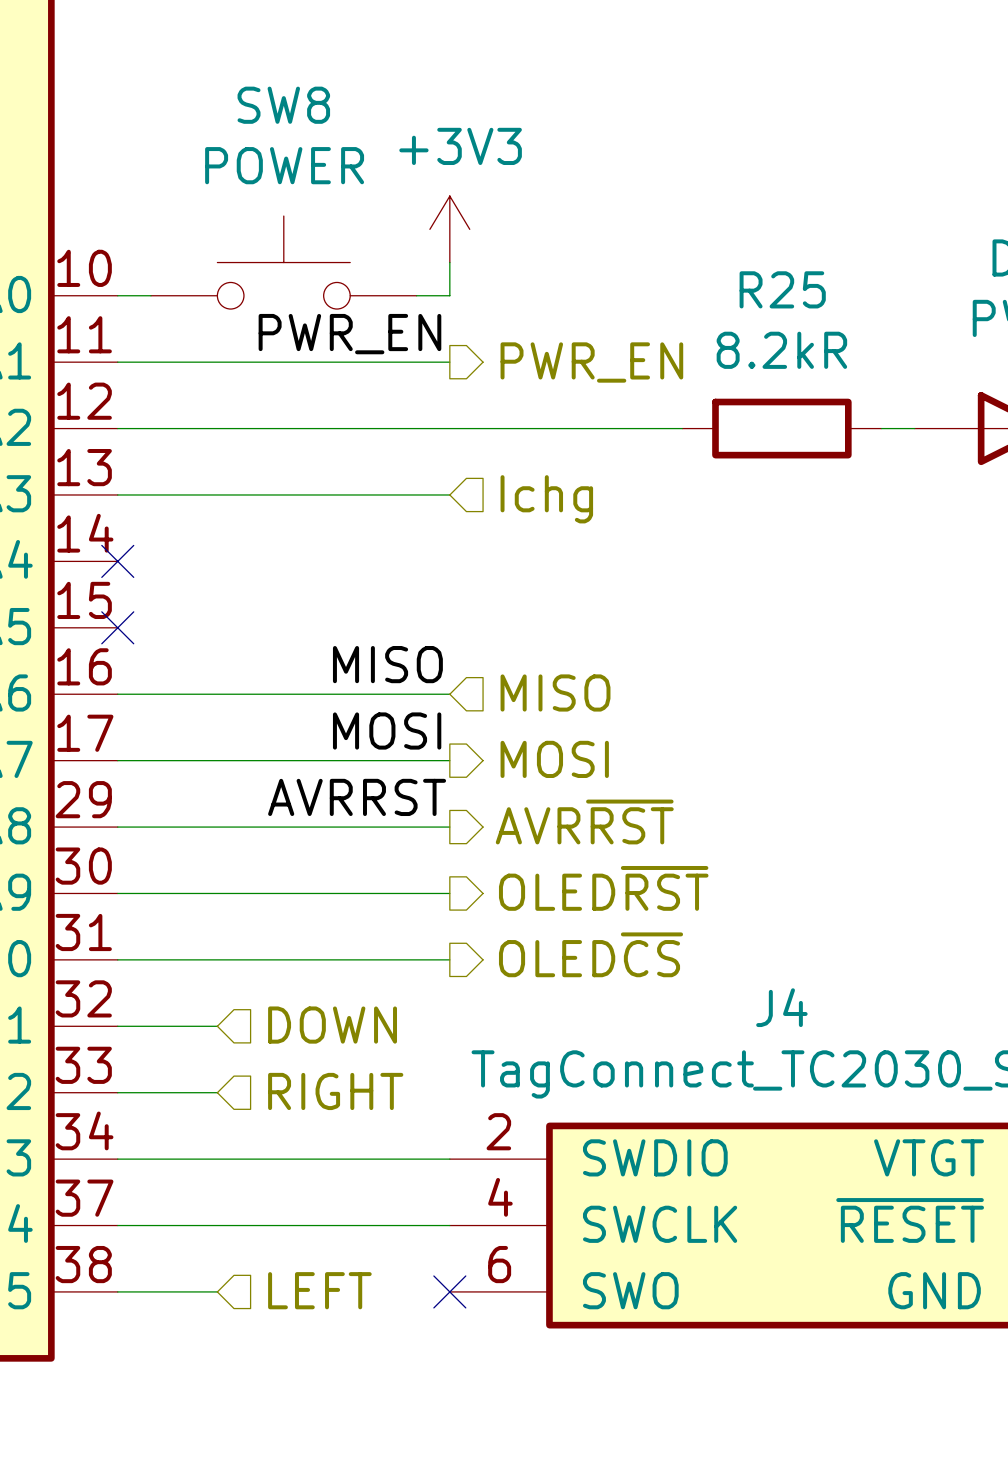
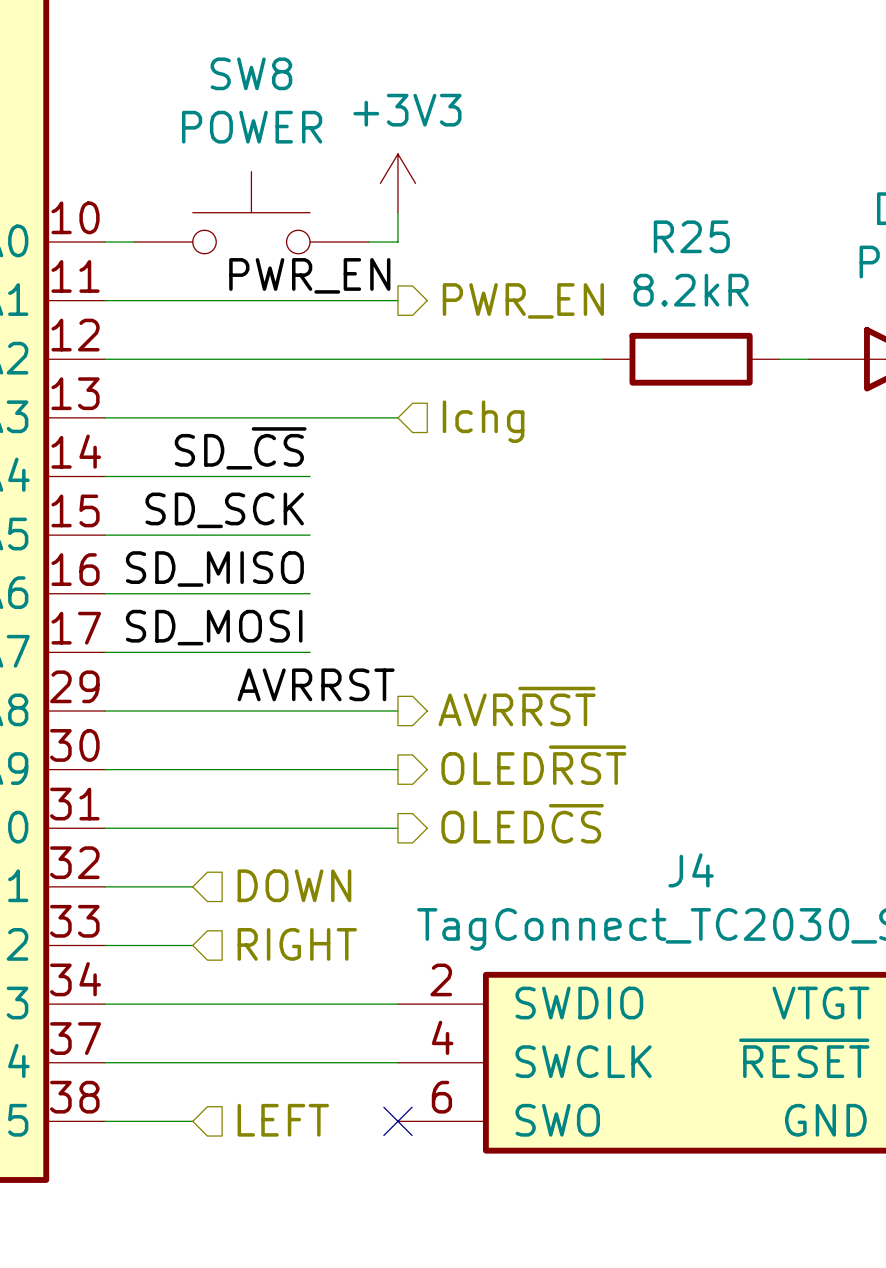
label: none -> SD_~{CS} (240, 448)
wire: none -> (104, 476) (310, 476)
no-connect mark: (117, 561) -> none
label: none -> SD_SCK (224, 510)
wire: none -> (104, 535) (310, 535)
no-connect mark: (117, 627) -> none
label: MISO (387, 664) -> SD_MISO (214, 568)
hierarchical label: MISO (555, 692) -> none
wire: (350, 694) (449, 694) -> none
label: MOSI (387, 731) -> SD_MOSI (214, 627)
hierarchical label: MOSI (554, 759) -> none
wire: (350, 760) (449, 760) -> none

